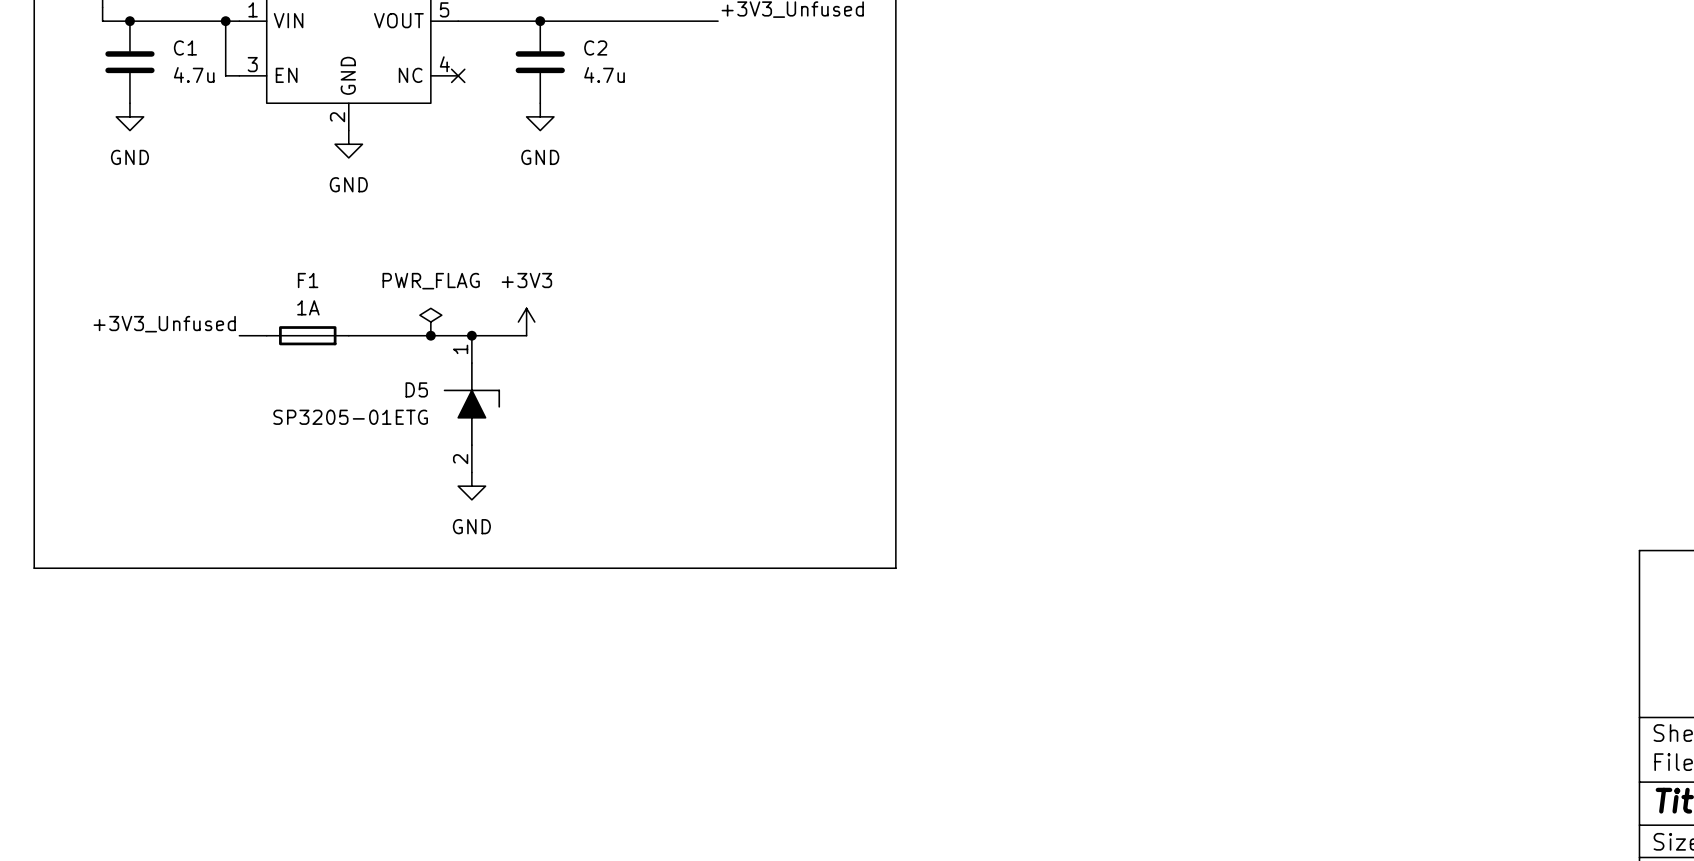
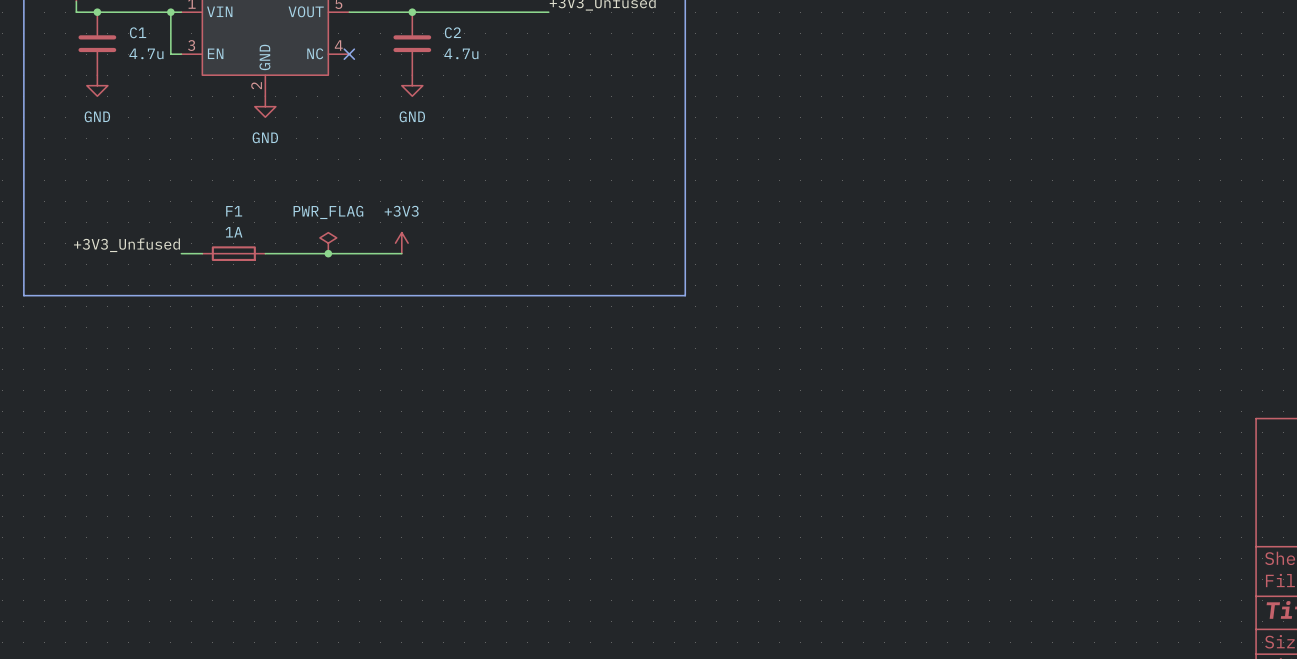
junction: (471, 335) -> none
line: (34, 390) (34, 568) (895, 568) (895, 390) -> (23, 295) (685, 295)
D5: SP3205-01ETG (471, 404) -> none
power symbol: GND (471, 486) -> none

